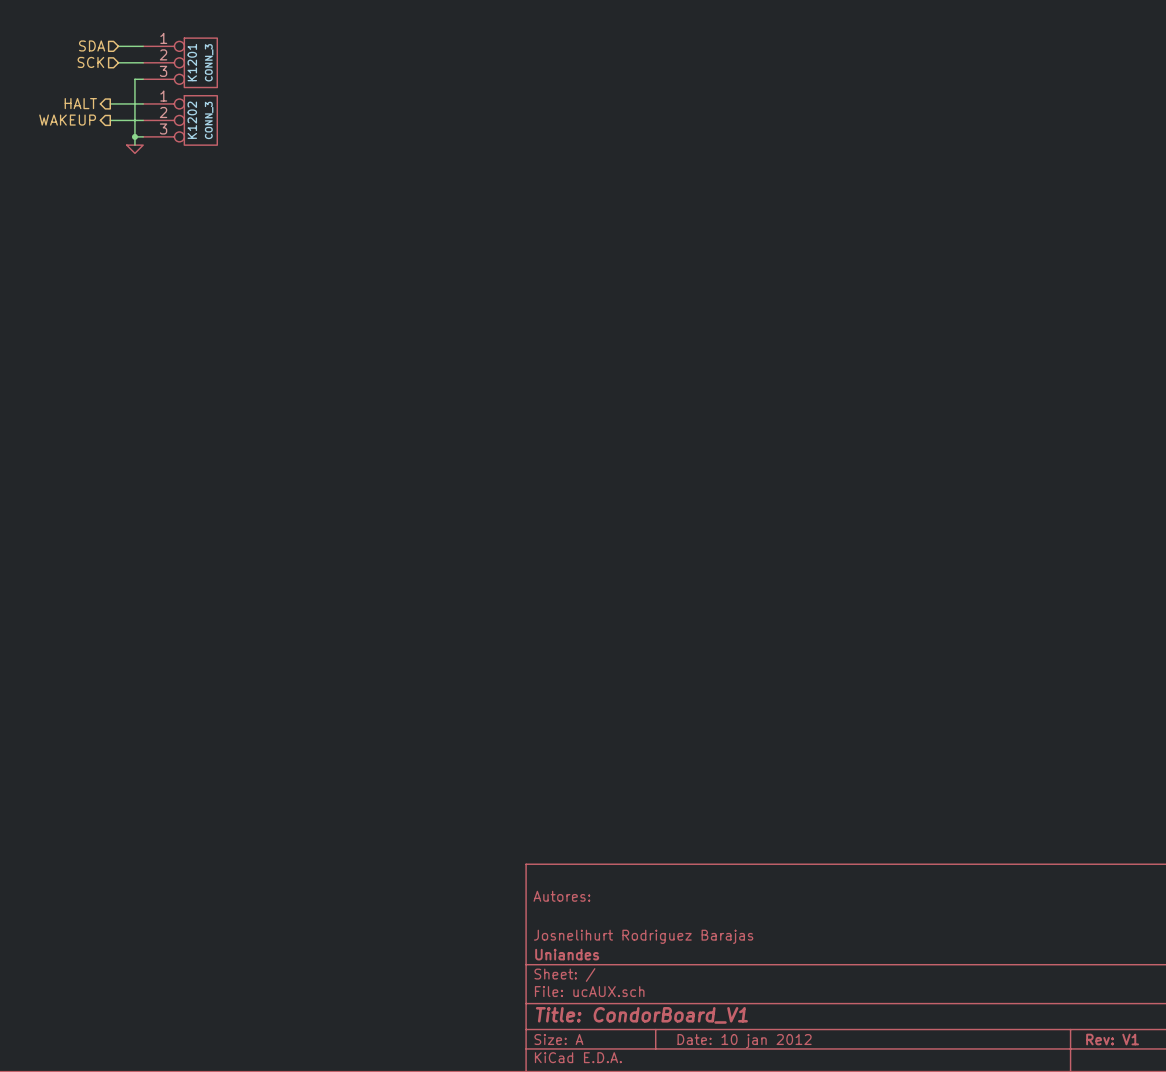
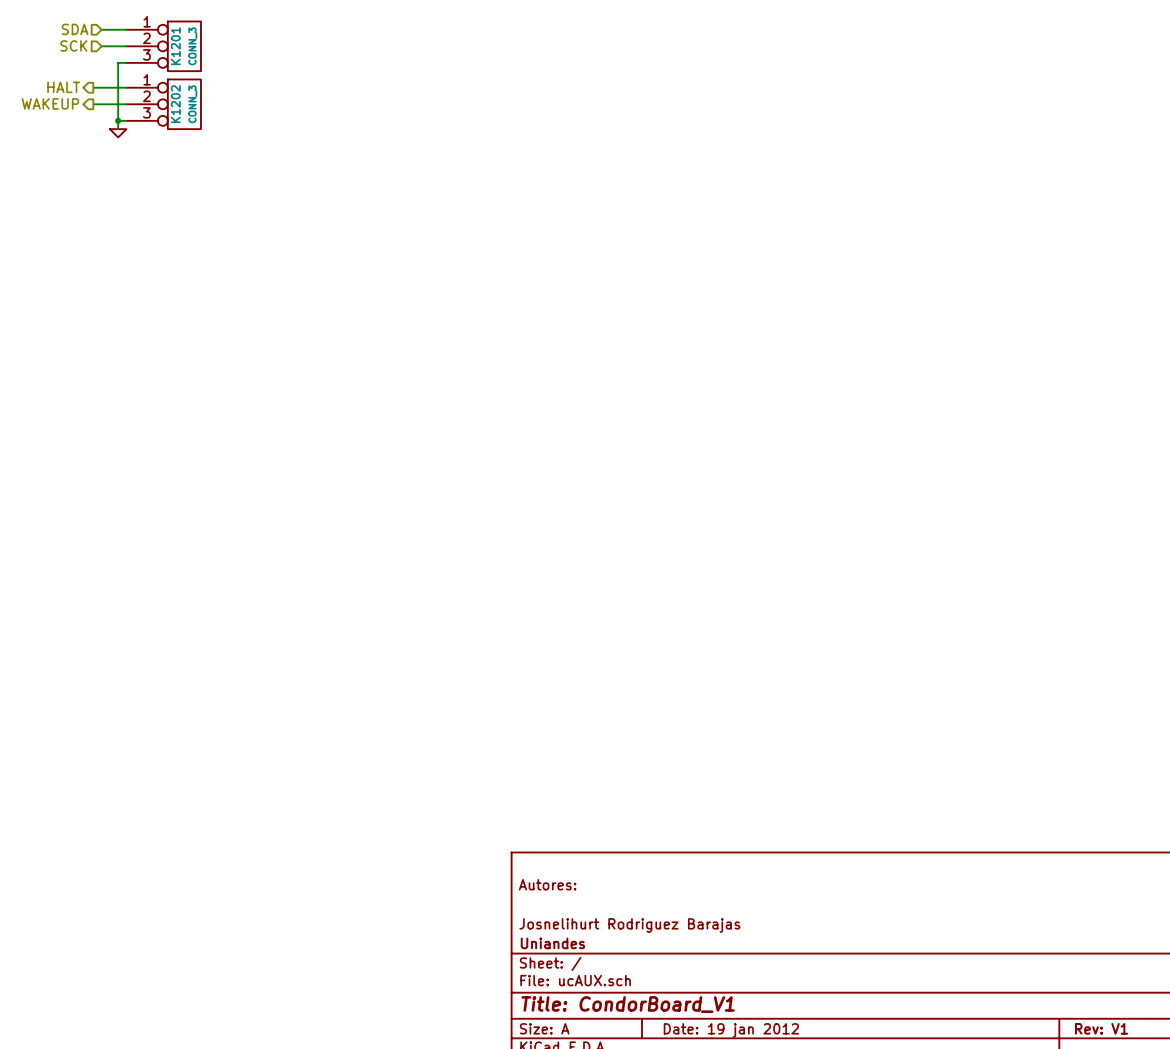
title block: Date: 10 jan 2012 (744, 1041) -> Date: 19 jan 2012 (731, 1030)

